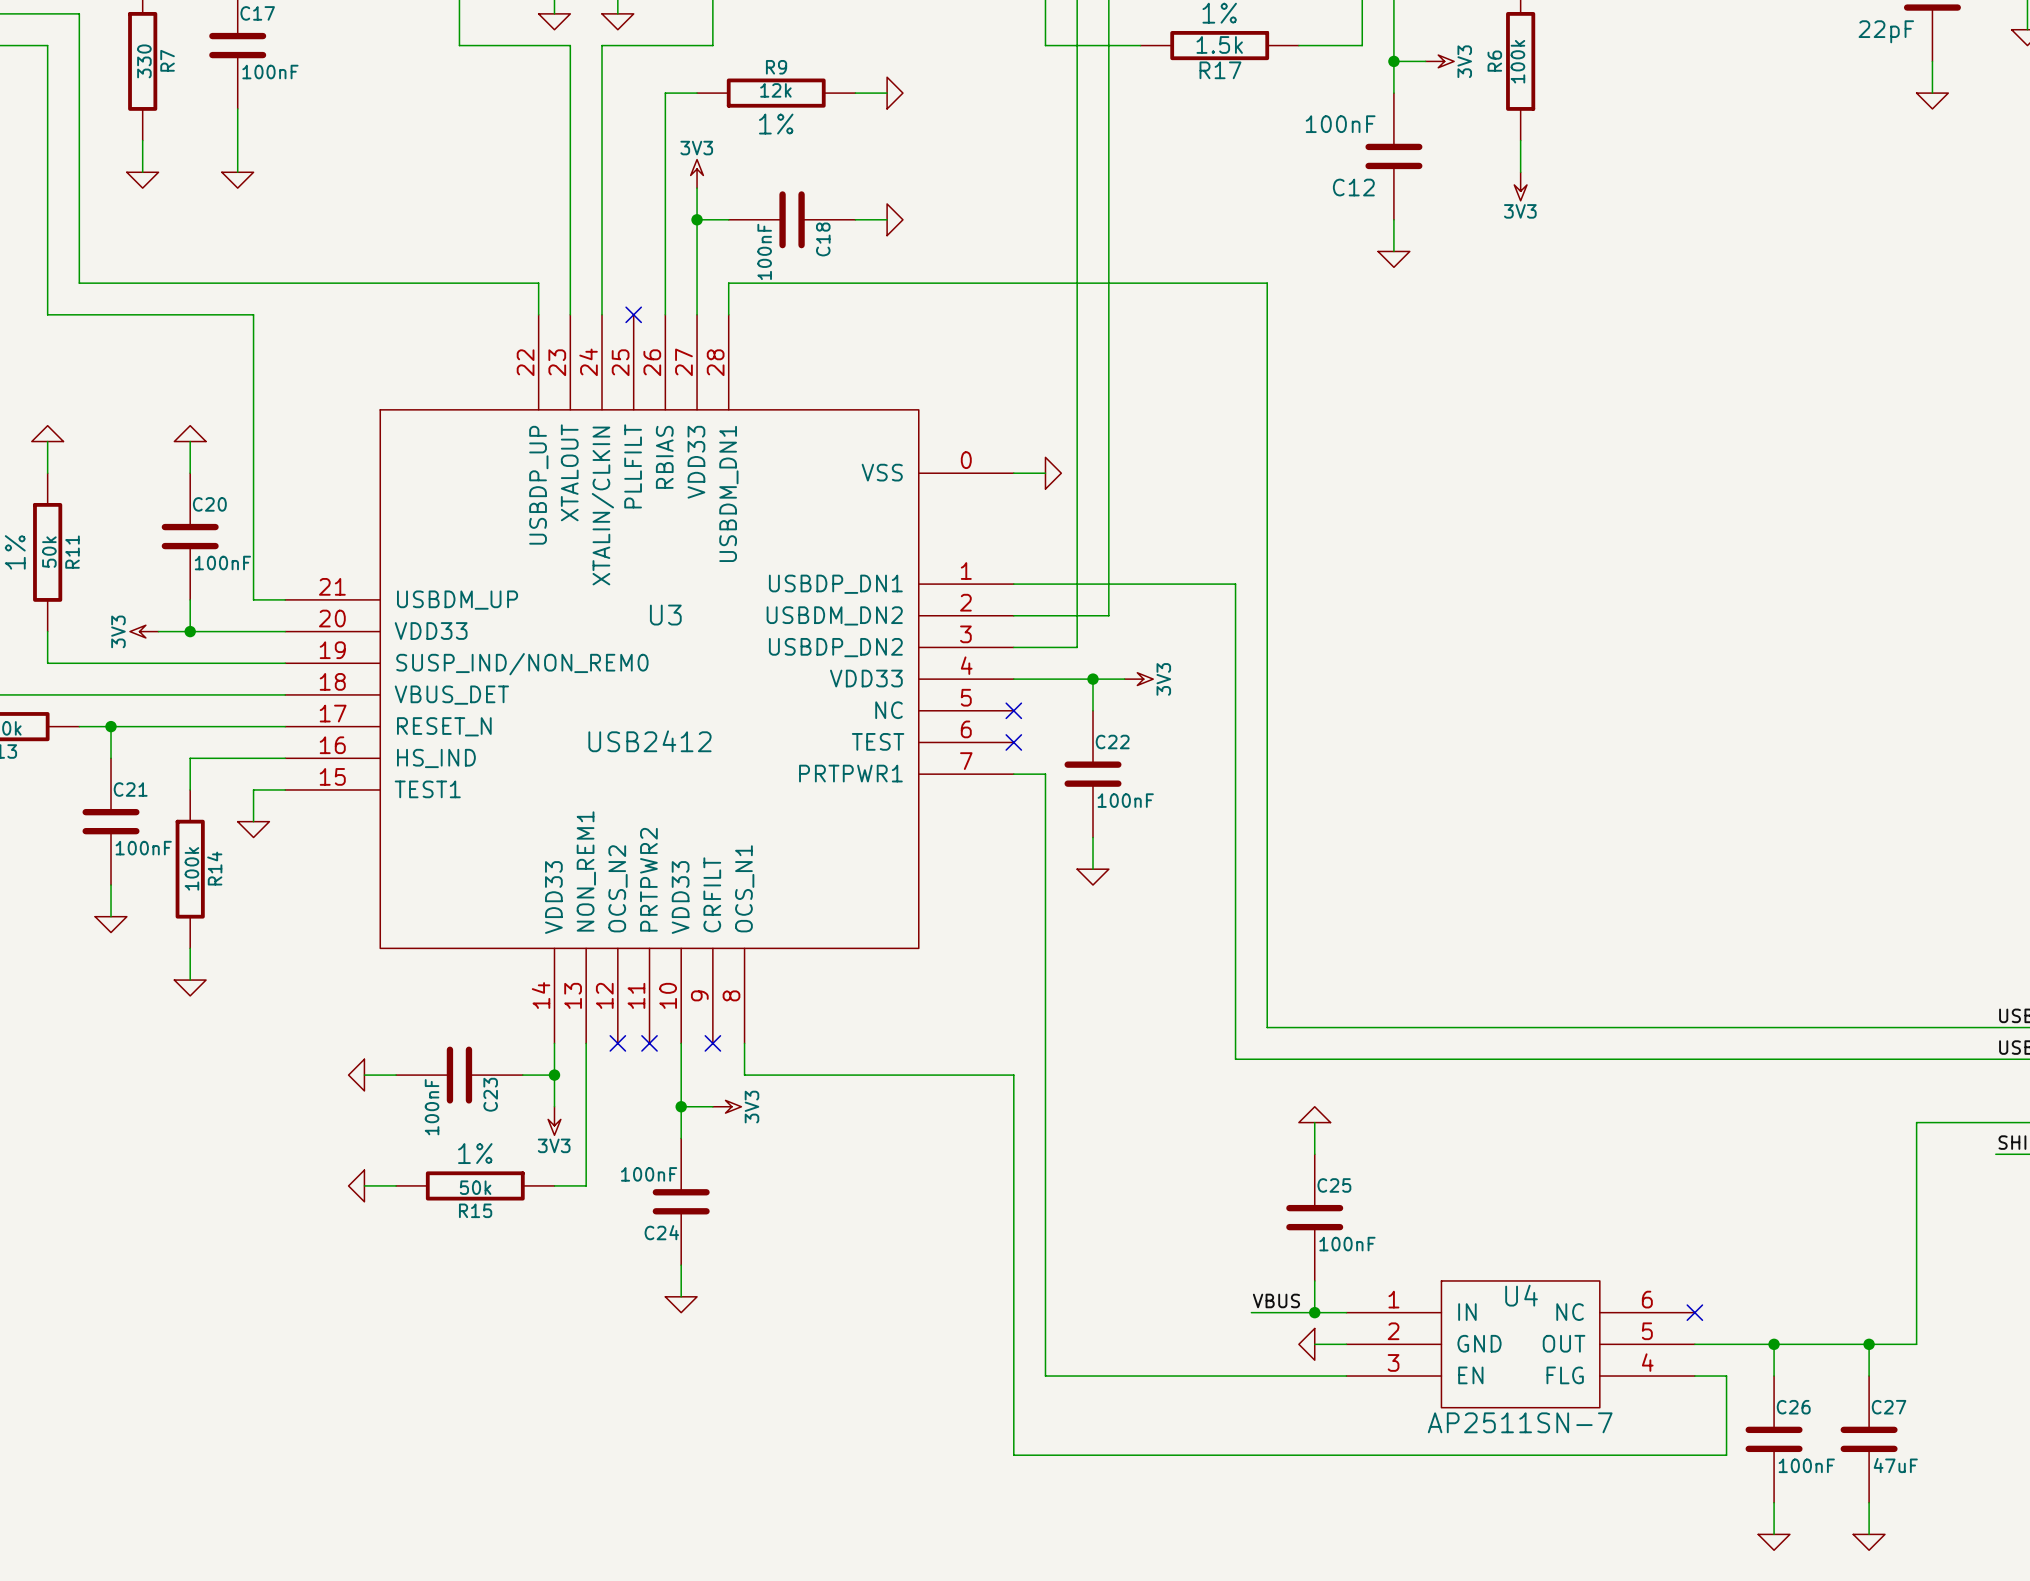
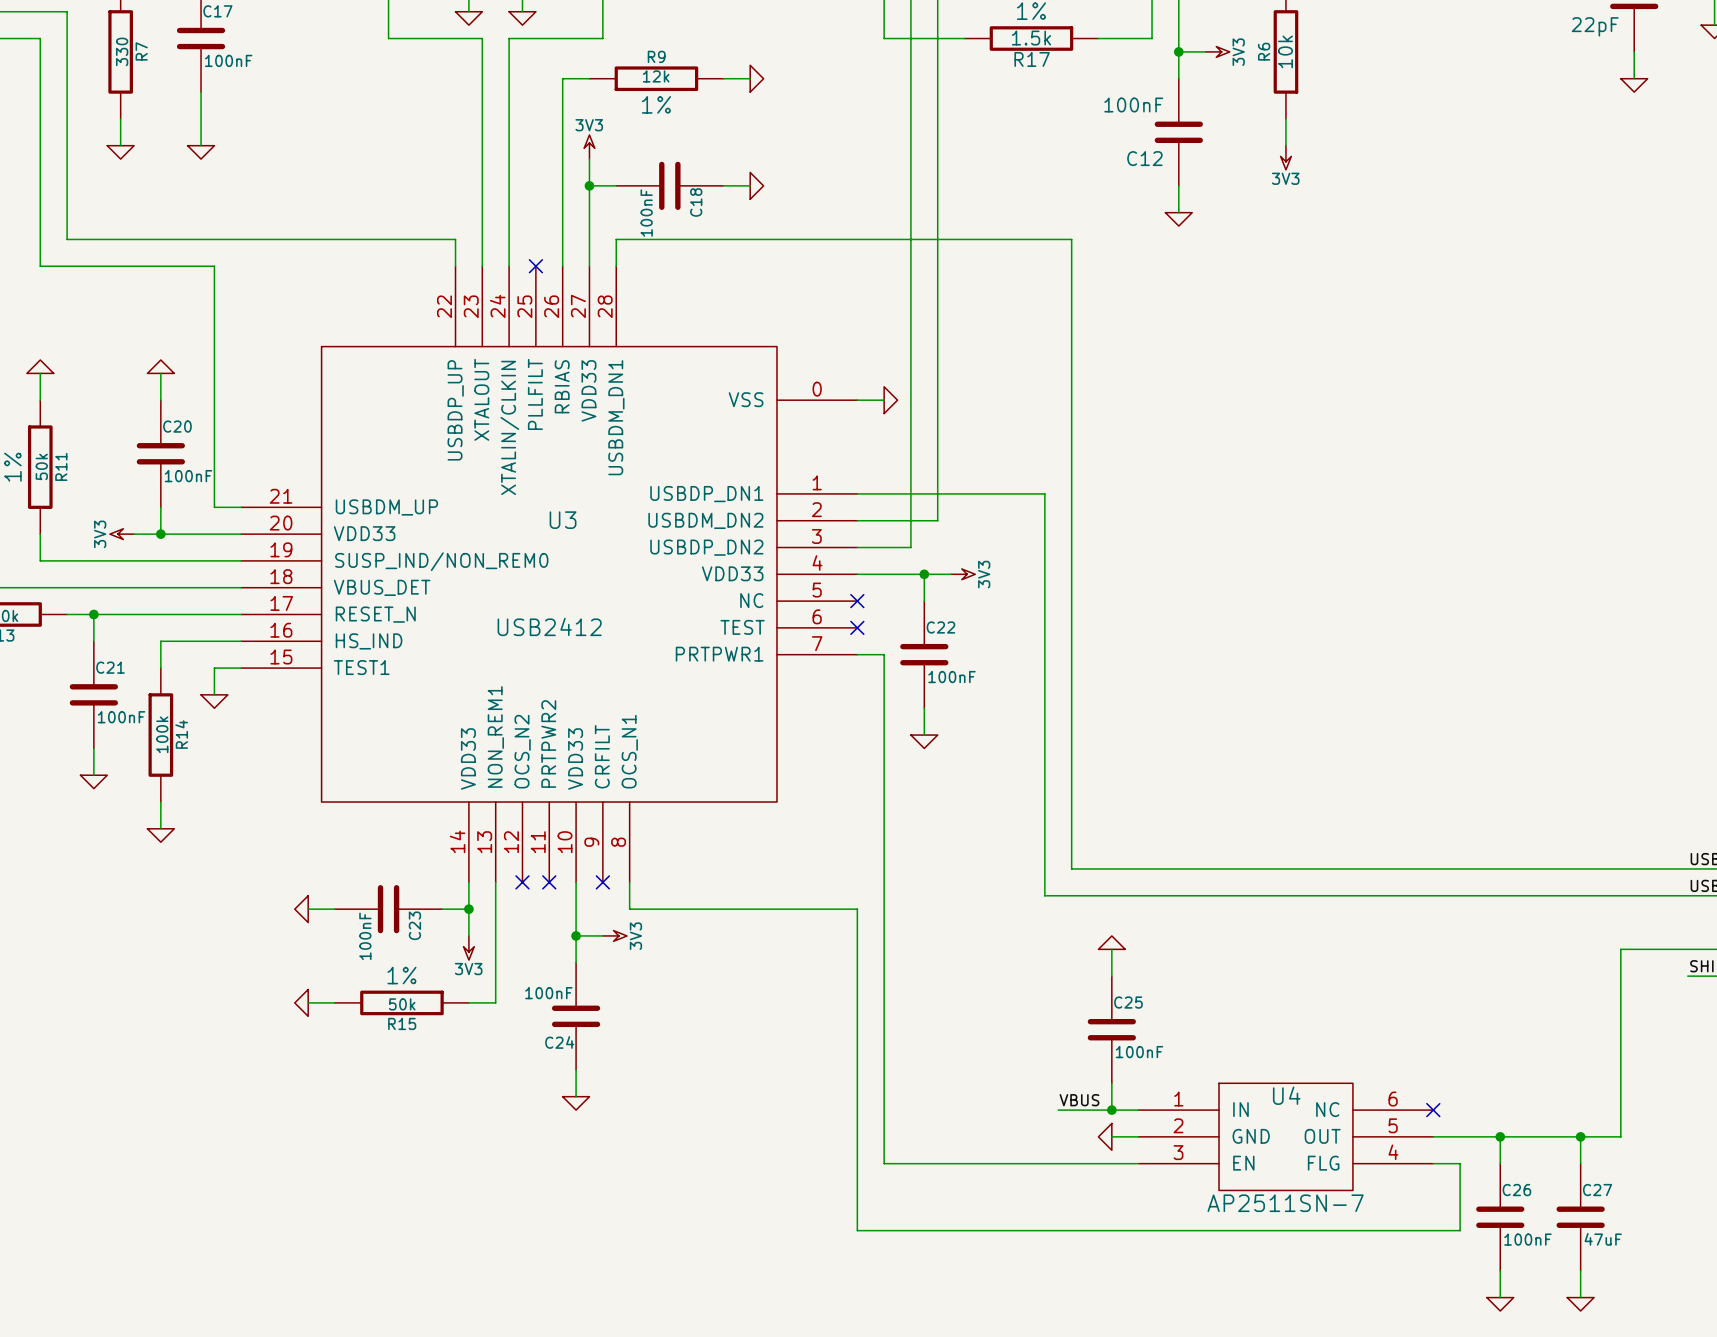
R6 value: 100k (1517, 61) -> 10k (1285, 51)

